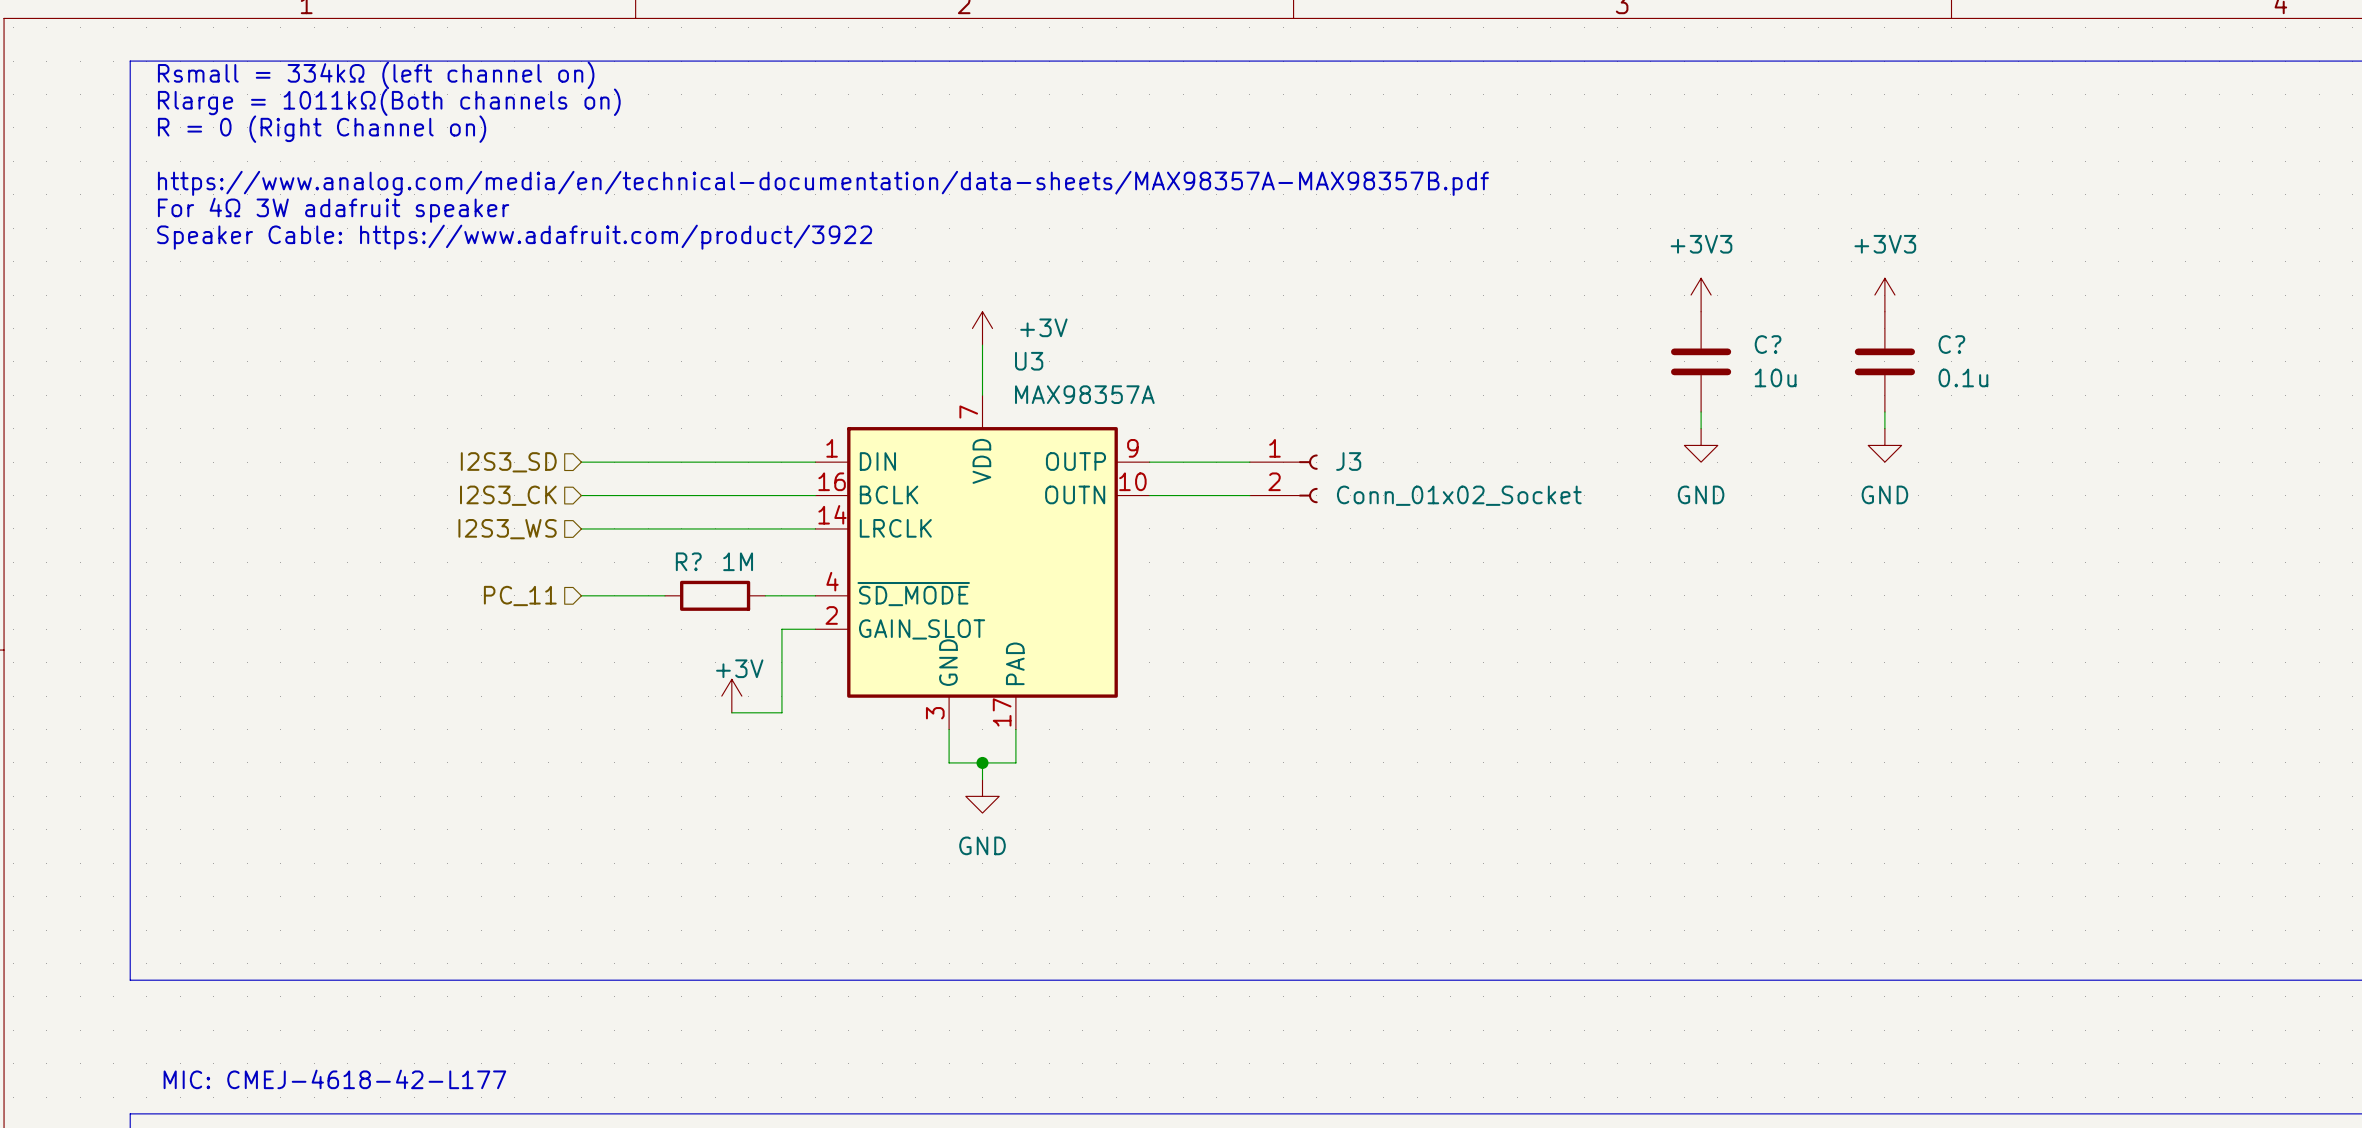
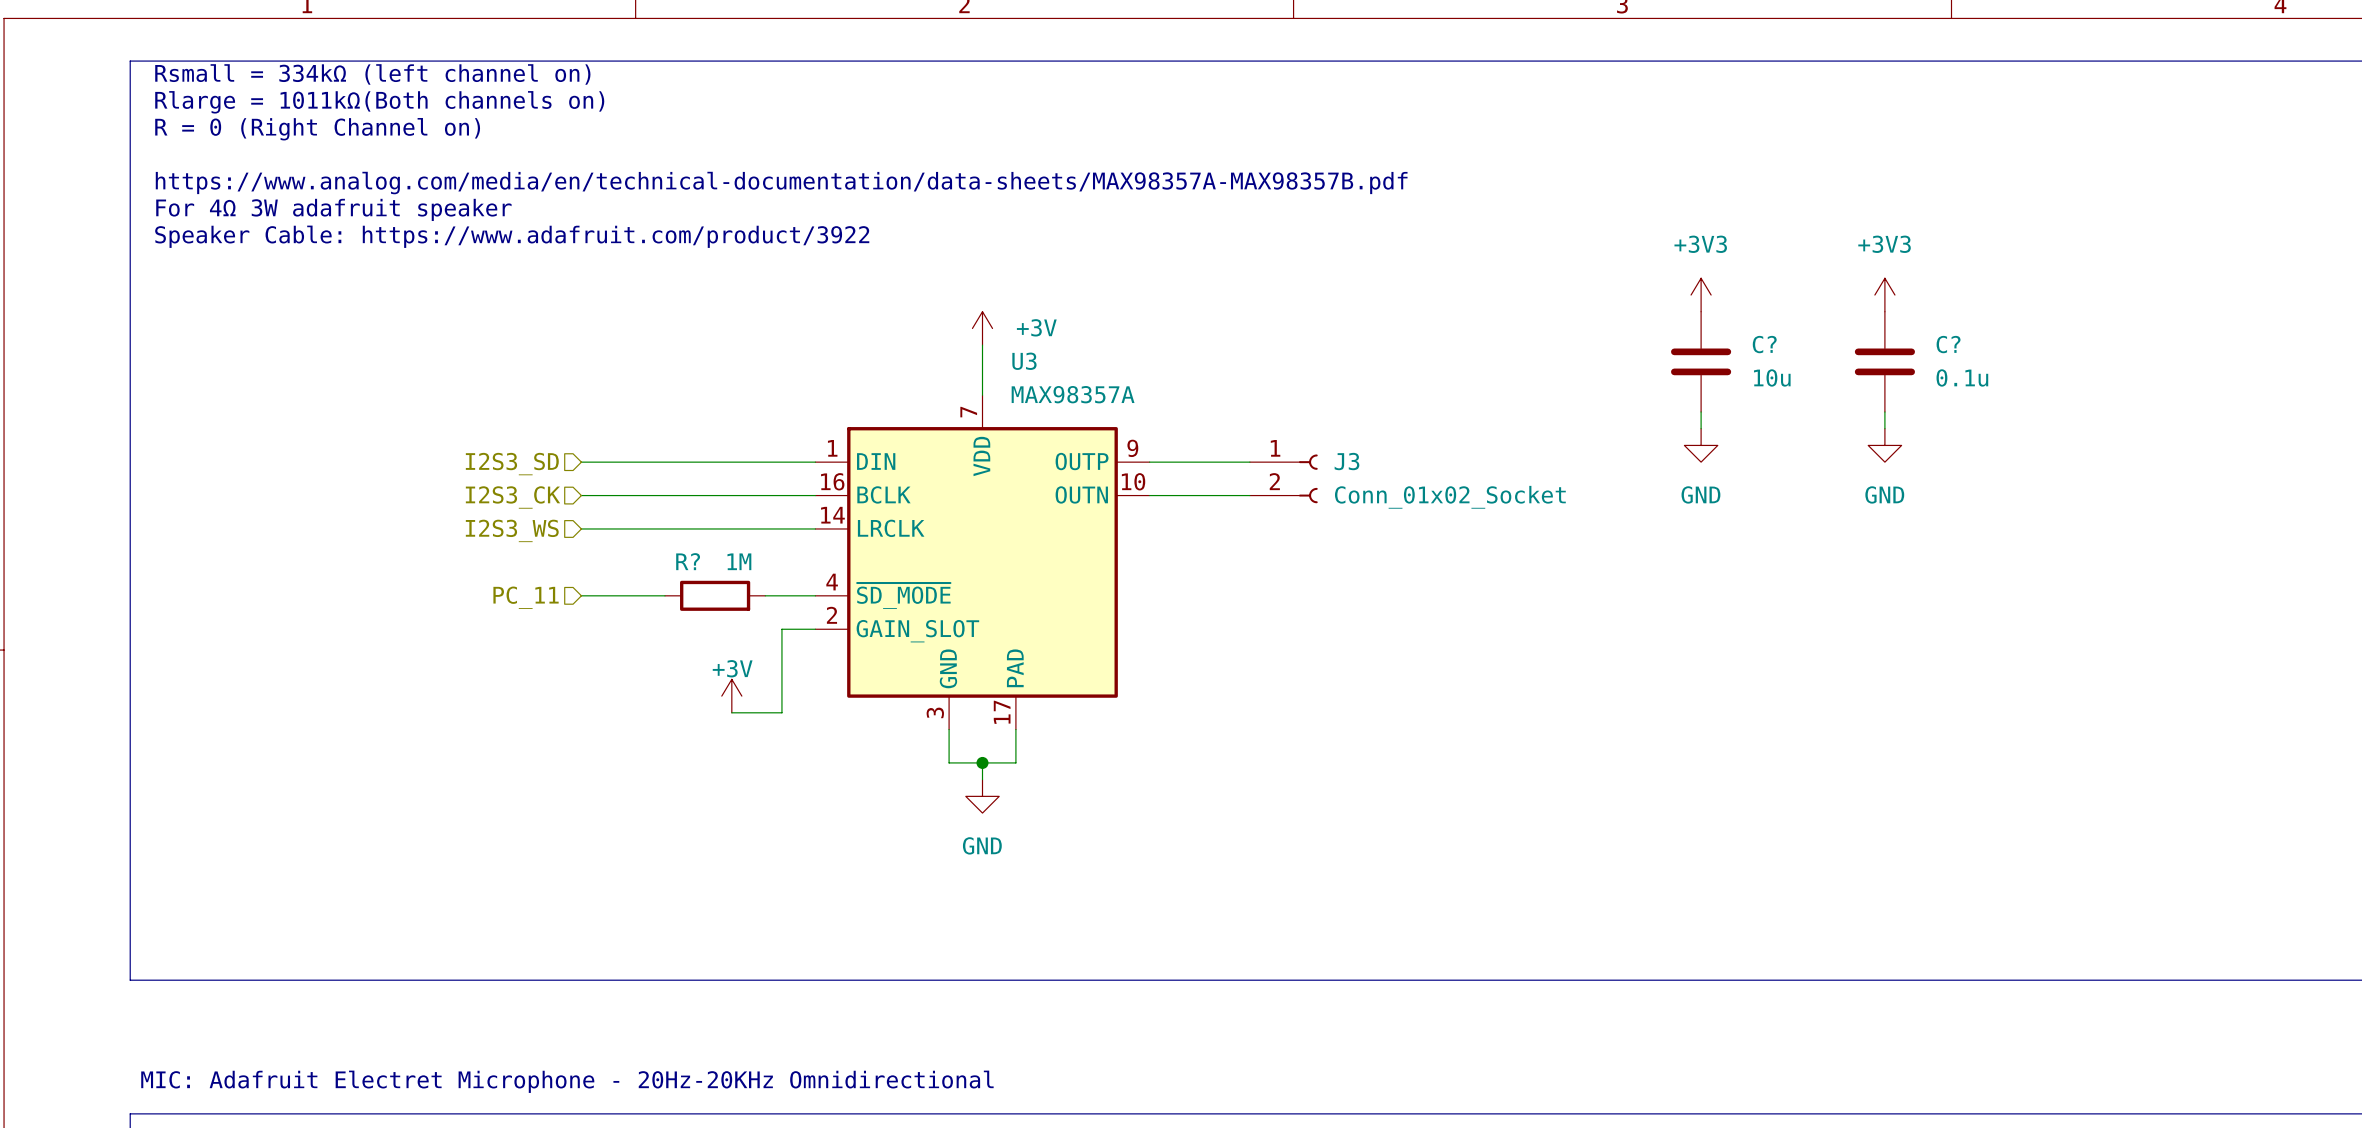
text: MIC: CMEJ-4618-42-L177 (334, 1079) -> none
text: none -> MIC: Adafruit Electret Microphone - 20Hz-20KHz Omnidirectional (567, 1081)

